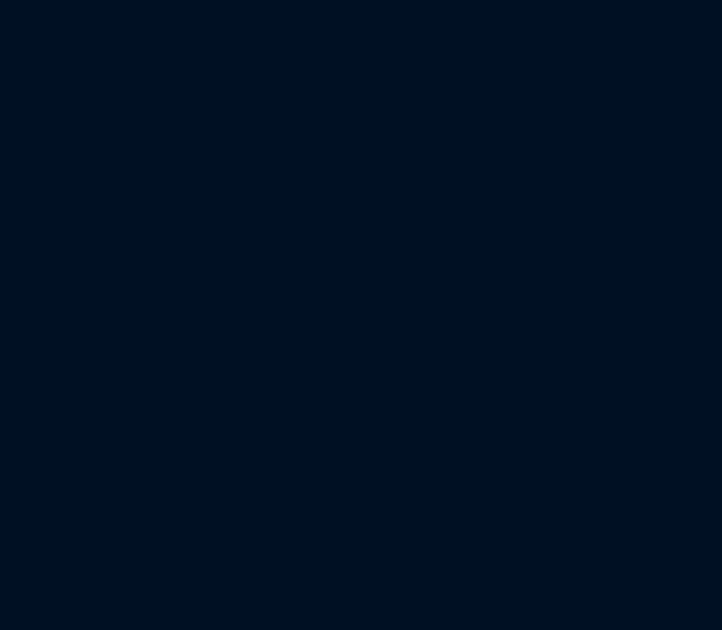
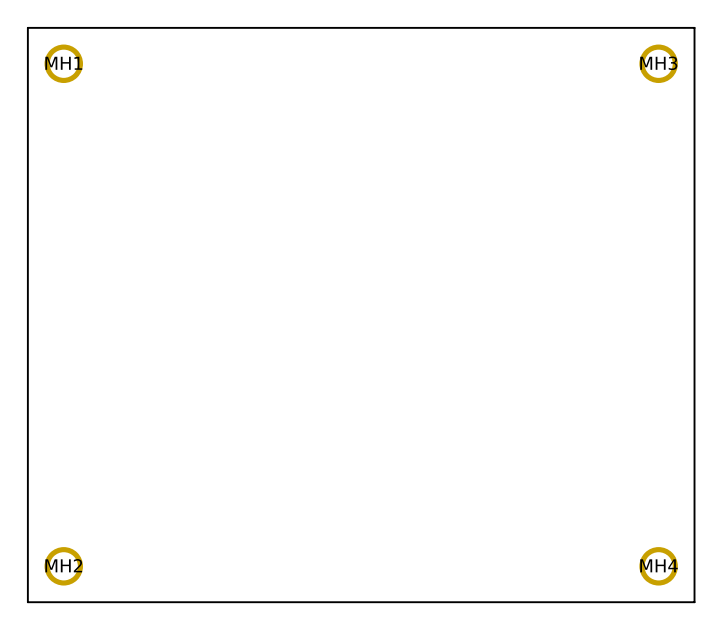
board edge: none -> (27, 27) (694, 27) (694, 602) (27, 602) (27, 27)
MH1: none -> (63, 63)
MH3: none -> (658, 63)
MH2: none -> (63, 566)
MH4: none -> (658, 566)

